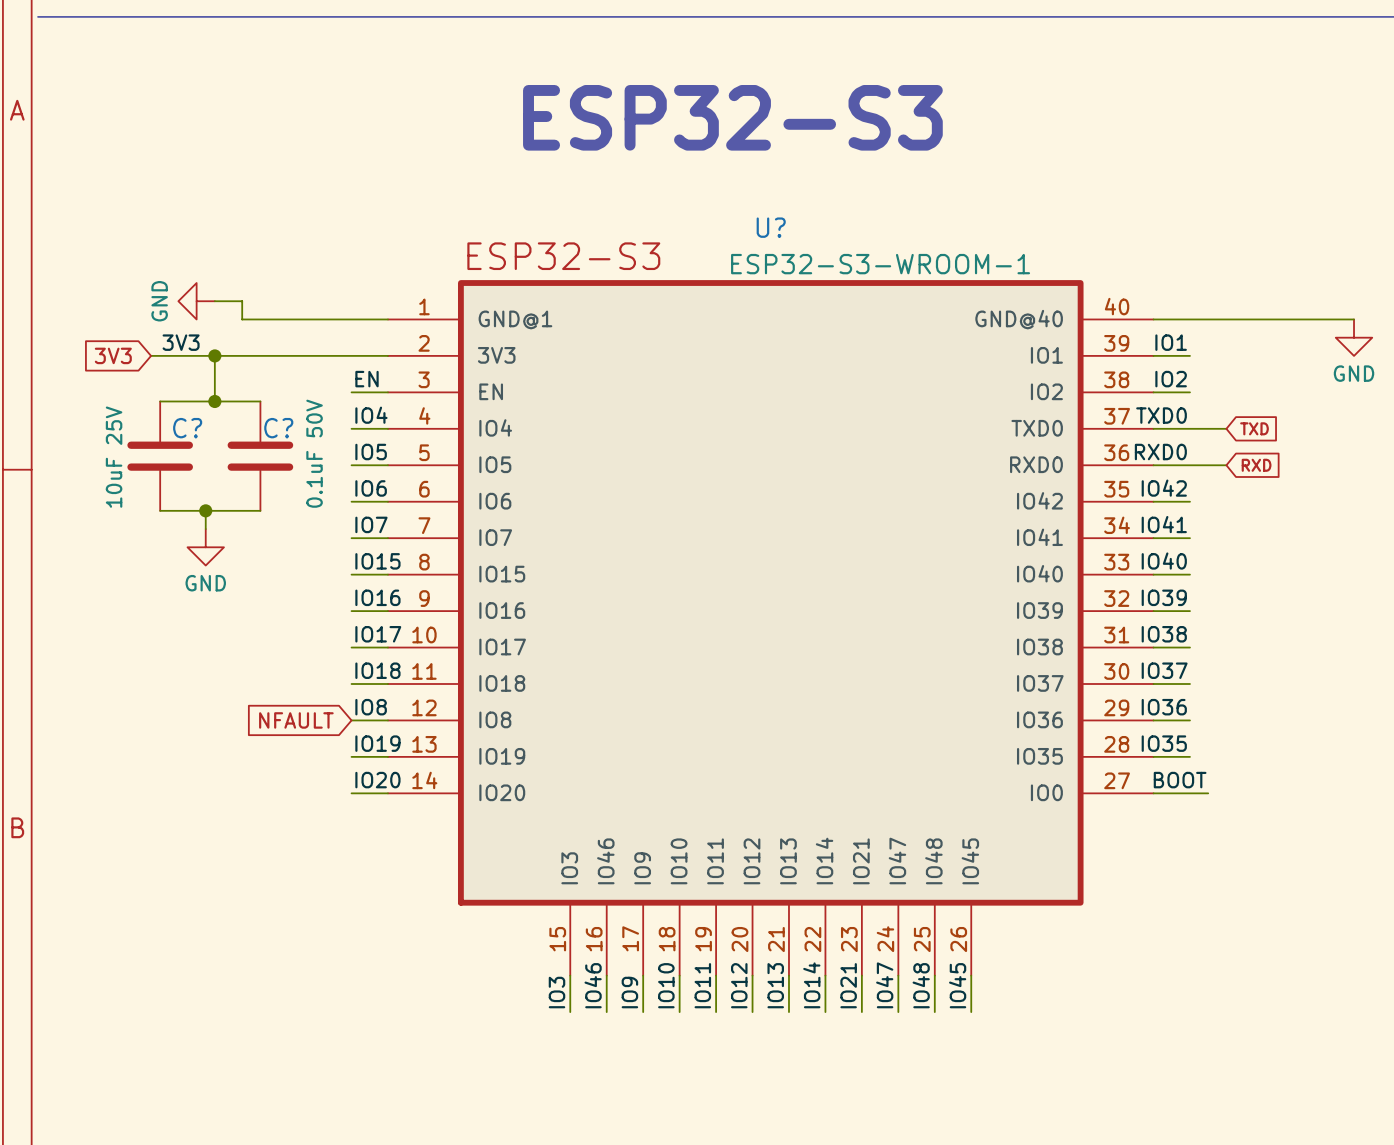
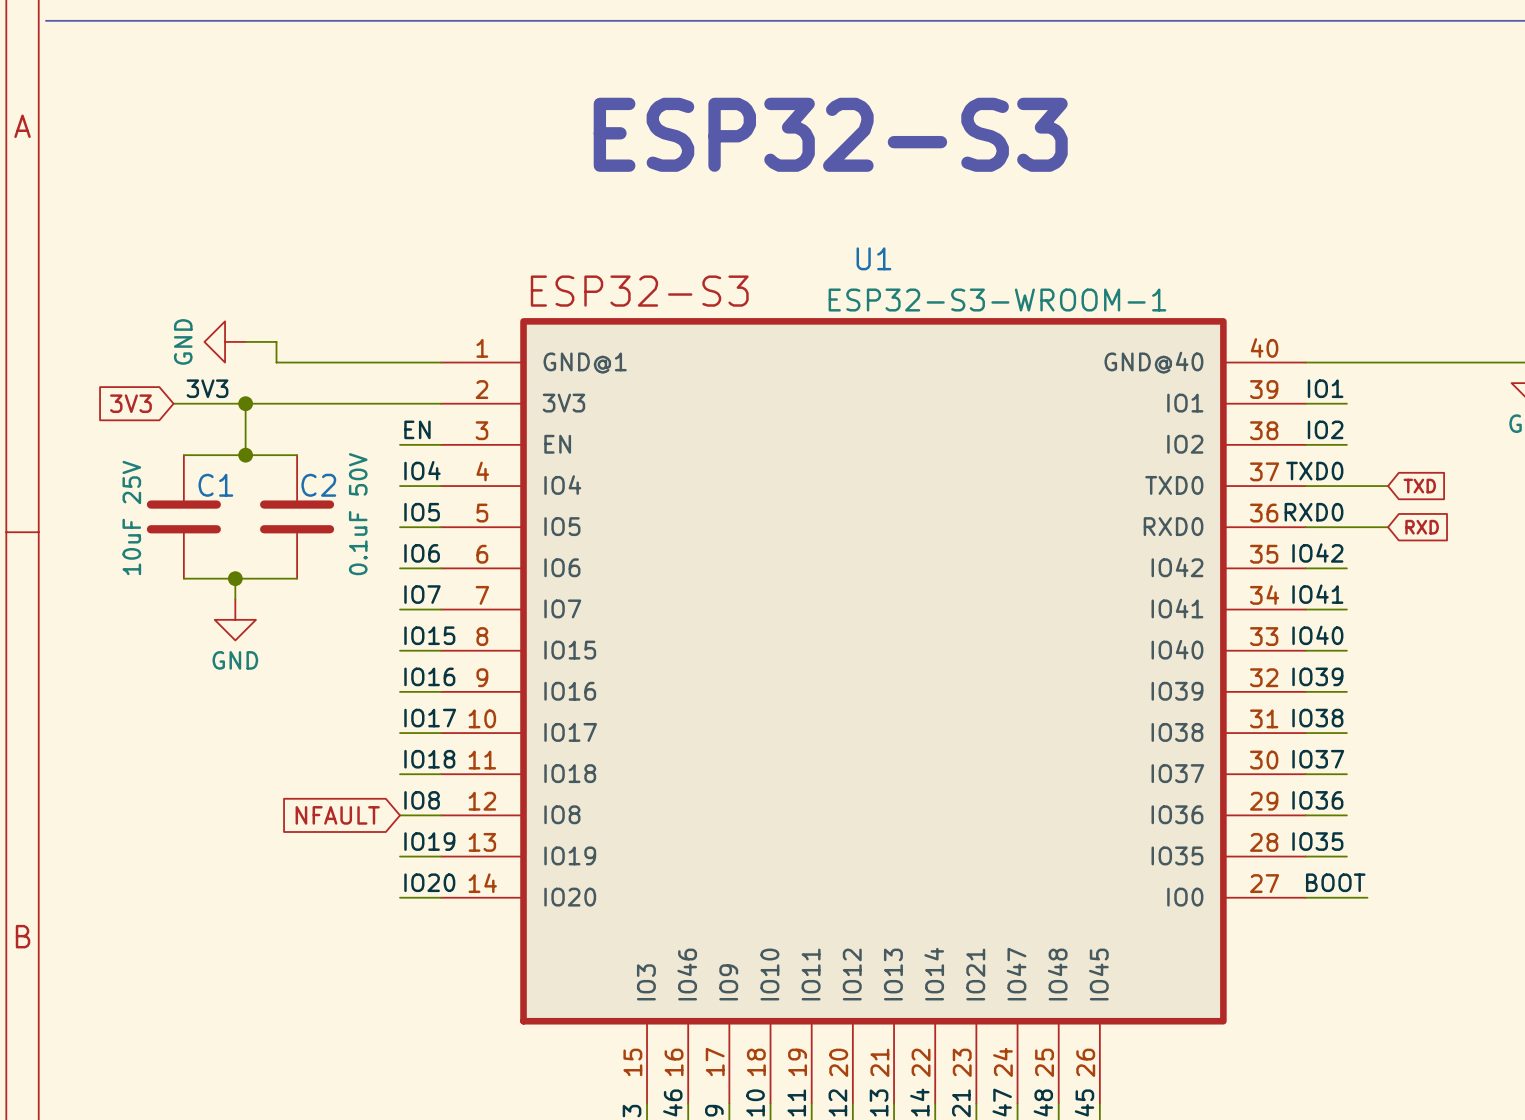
U? name: U? (771, 227) -> U1 (873, 258)
C? name: C? (187, 428) -> C1 (215, 485)
C? name: C? (278, 428) -> C2 (318, 485)

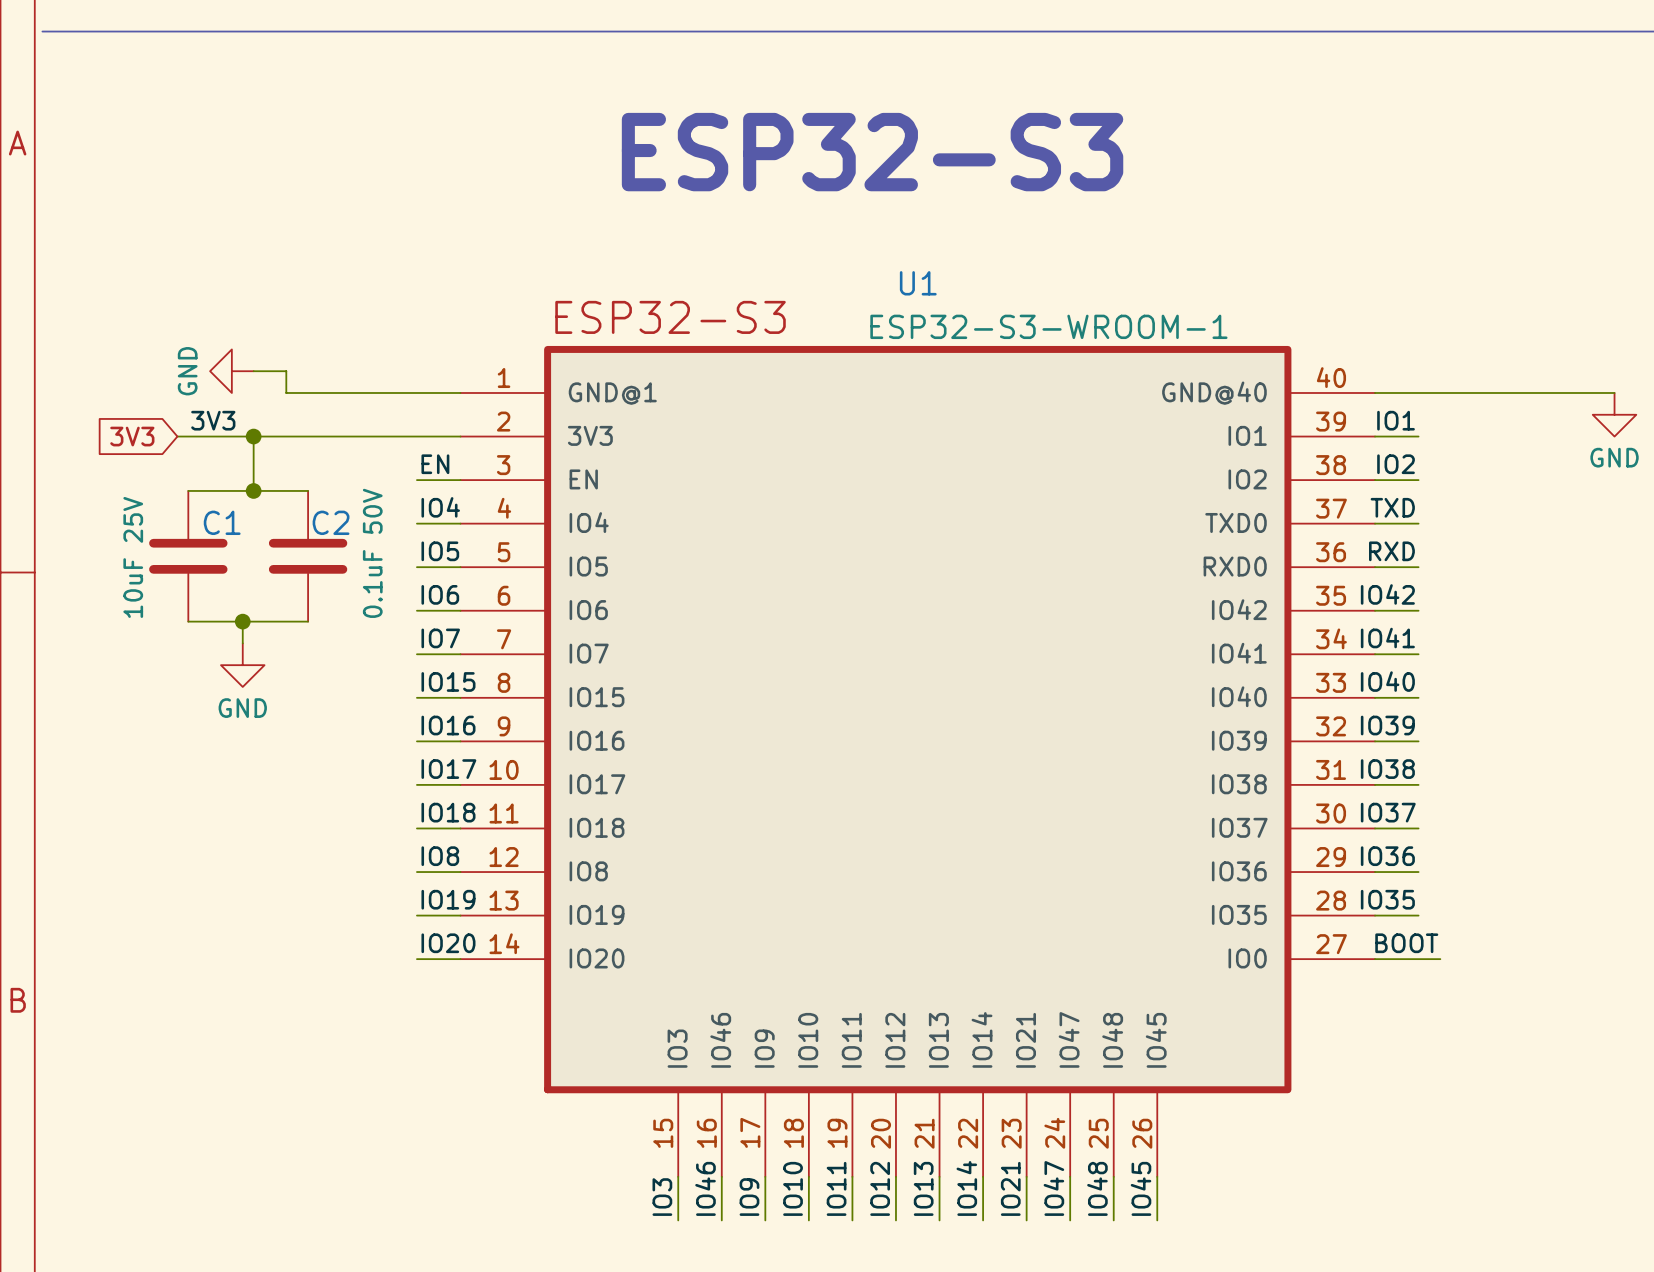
label: TXD0 (1314, 471) -> TXD (1392, 507)
wire: (1346, 486) (1388, 486) -> none
global label: TXD (1419, 486) -> none
label: RXD0 (1314, 512) -> RXD (1391, 551)
wire: (1346, 527) (1388, 527) -> none
global label: RXD (1422, 527) -> none
global label: NFAULT (337, 815) -> none

